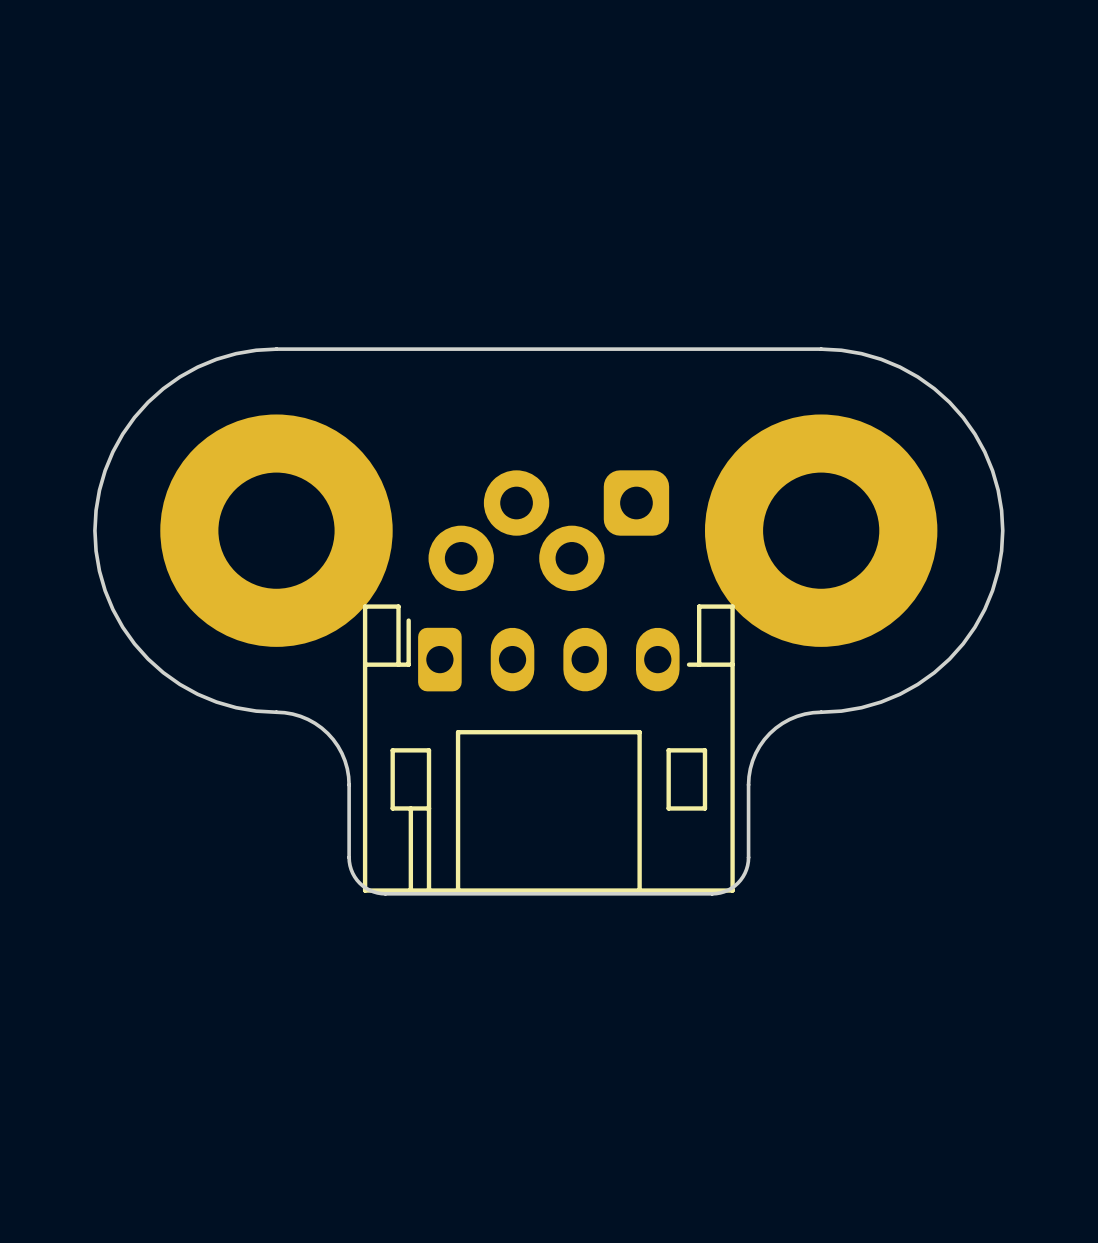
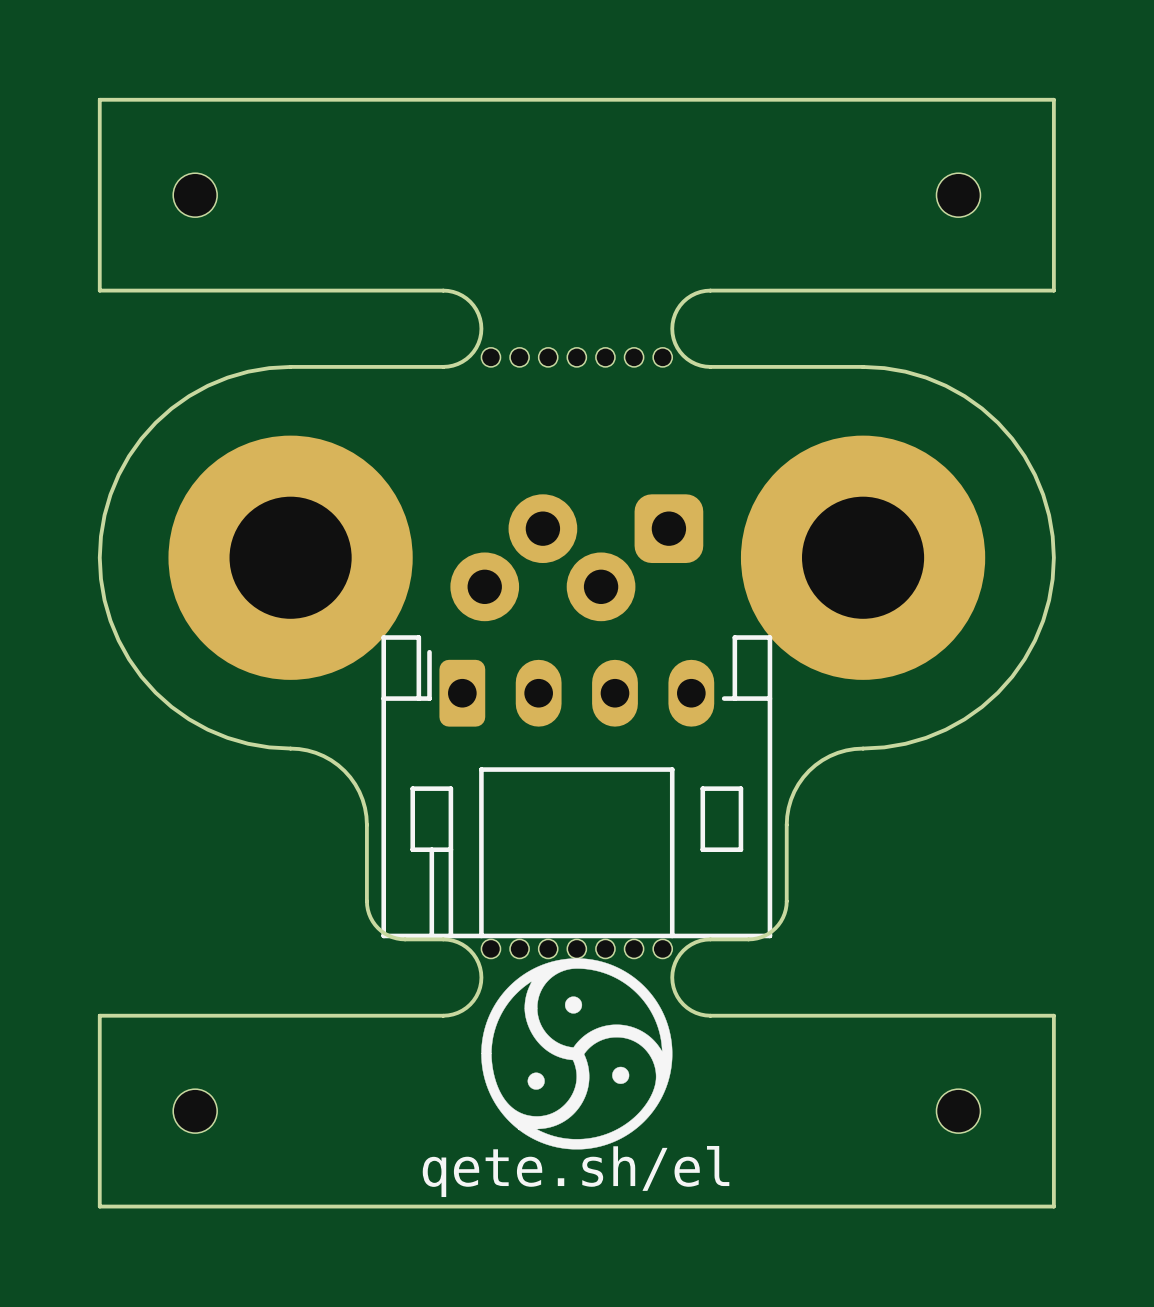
part: none -> (195, 195)
part: none -> (958, 195)
board edge: none -> (710, 290) (1053, 290) (1053, 99) (99, 99) (99, 290) (443, 290)
part: none -> (576, 328)
board edge: (675, 349) (421, 349) -> none
board edge: (675, 893) (421, 893) -> none
drawing: none -> [481, 958, 673, 1150]
part: none -> (576, 977)
board edge: none -> (710, 1015) (1053, 1015) (1053, 1206) (99, 1206) (99, 1015) (443, 1015)
part: none -> (195, 1111)
part: none -> (958, 1111)
text: none -> qete.sh/el (576, 1171)

